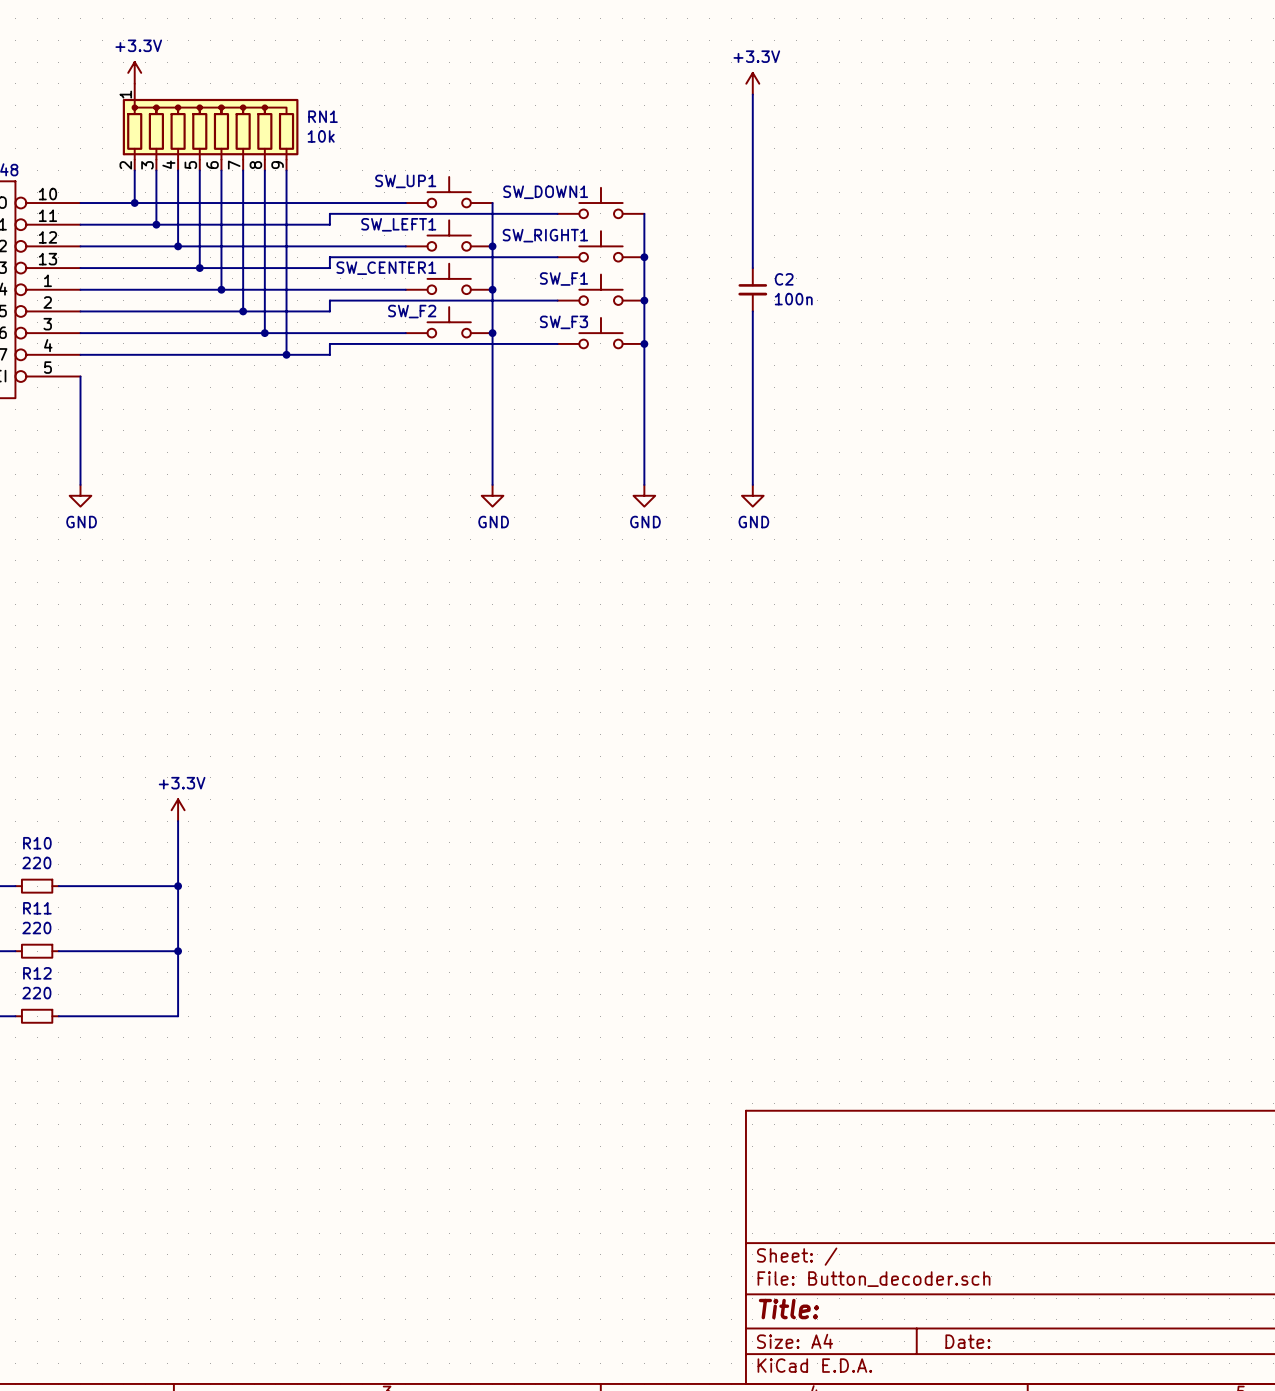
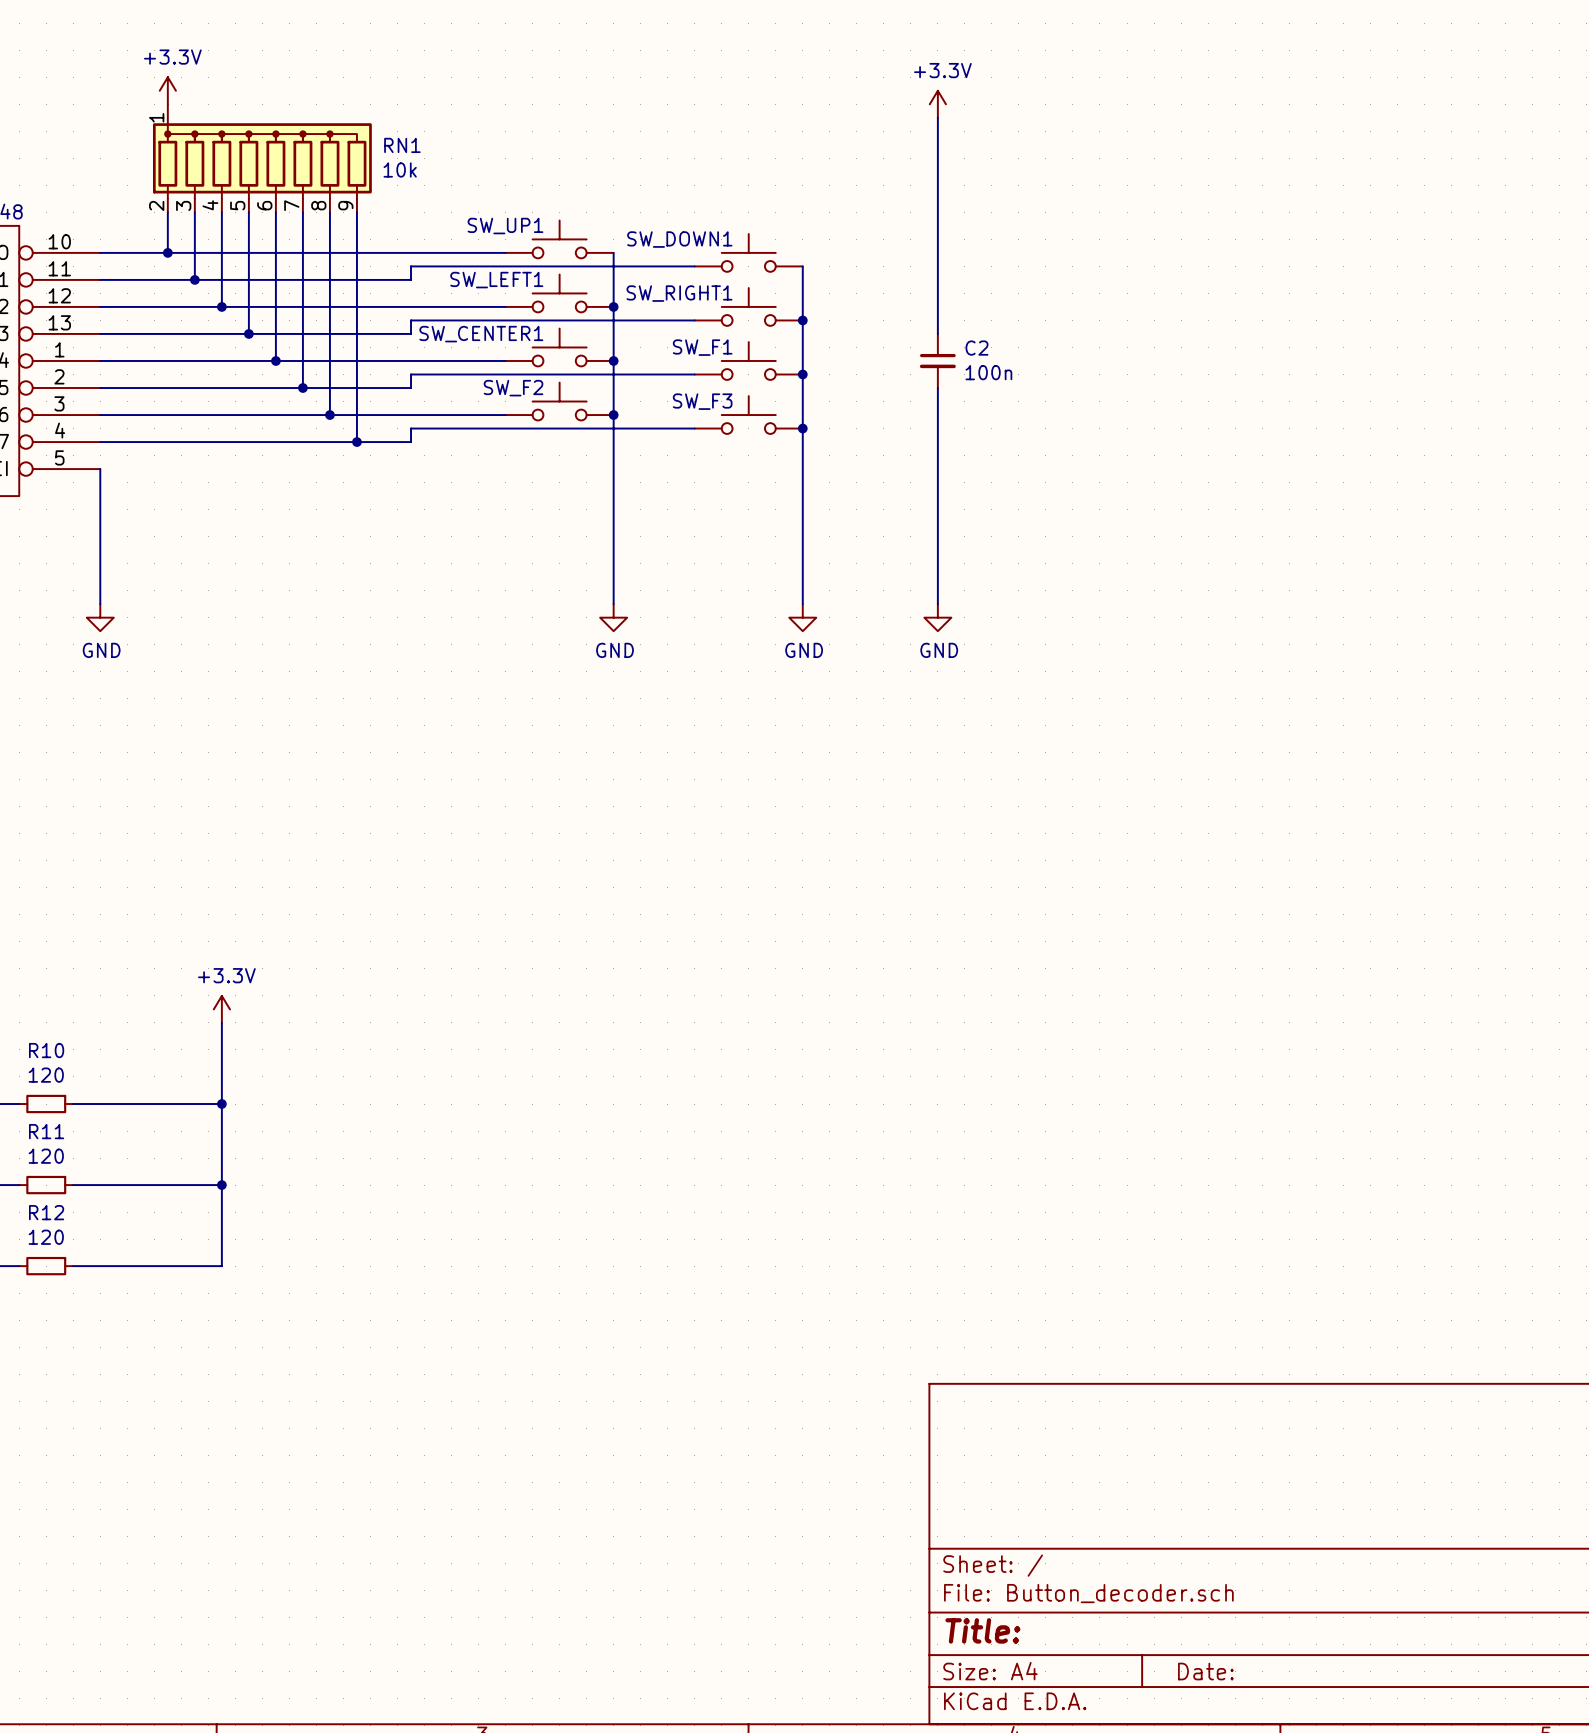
R10 value: 220 (36, 862) -> 120 (46, 1075)
R11 value: 220 (36, 928) -> 120 (46, 1156)
R12 value: 220 (36, 993) -> 120 (46, 1237)

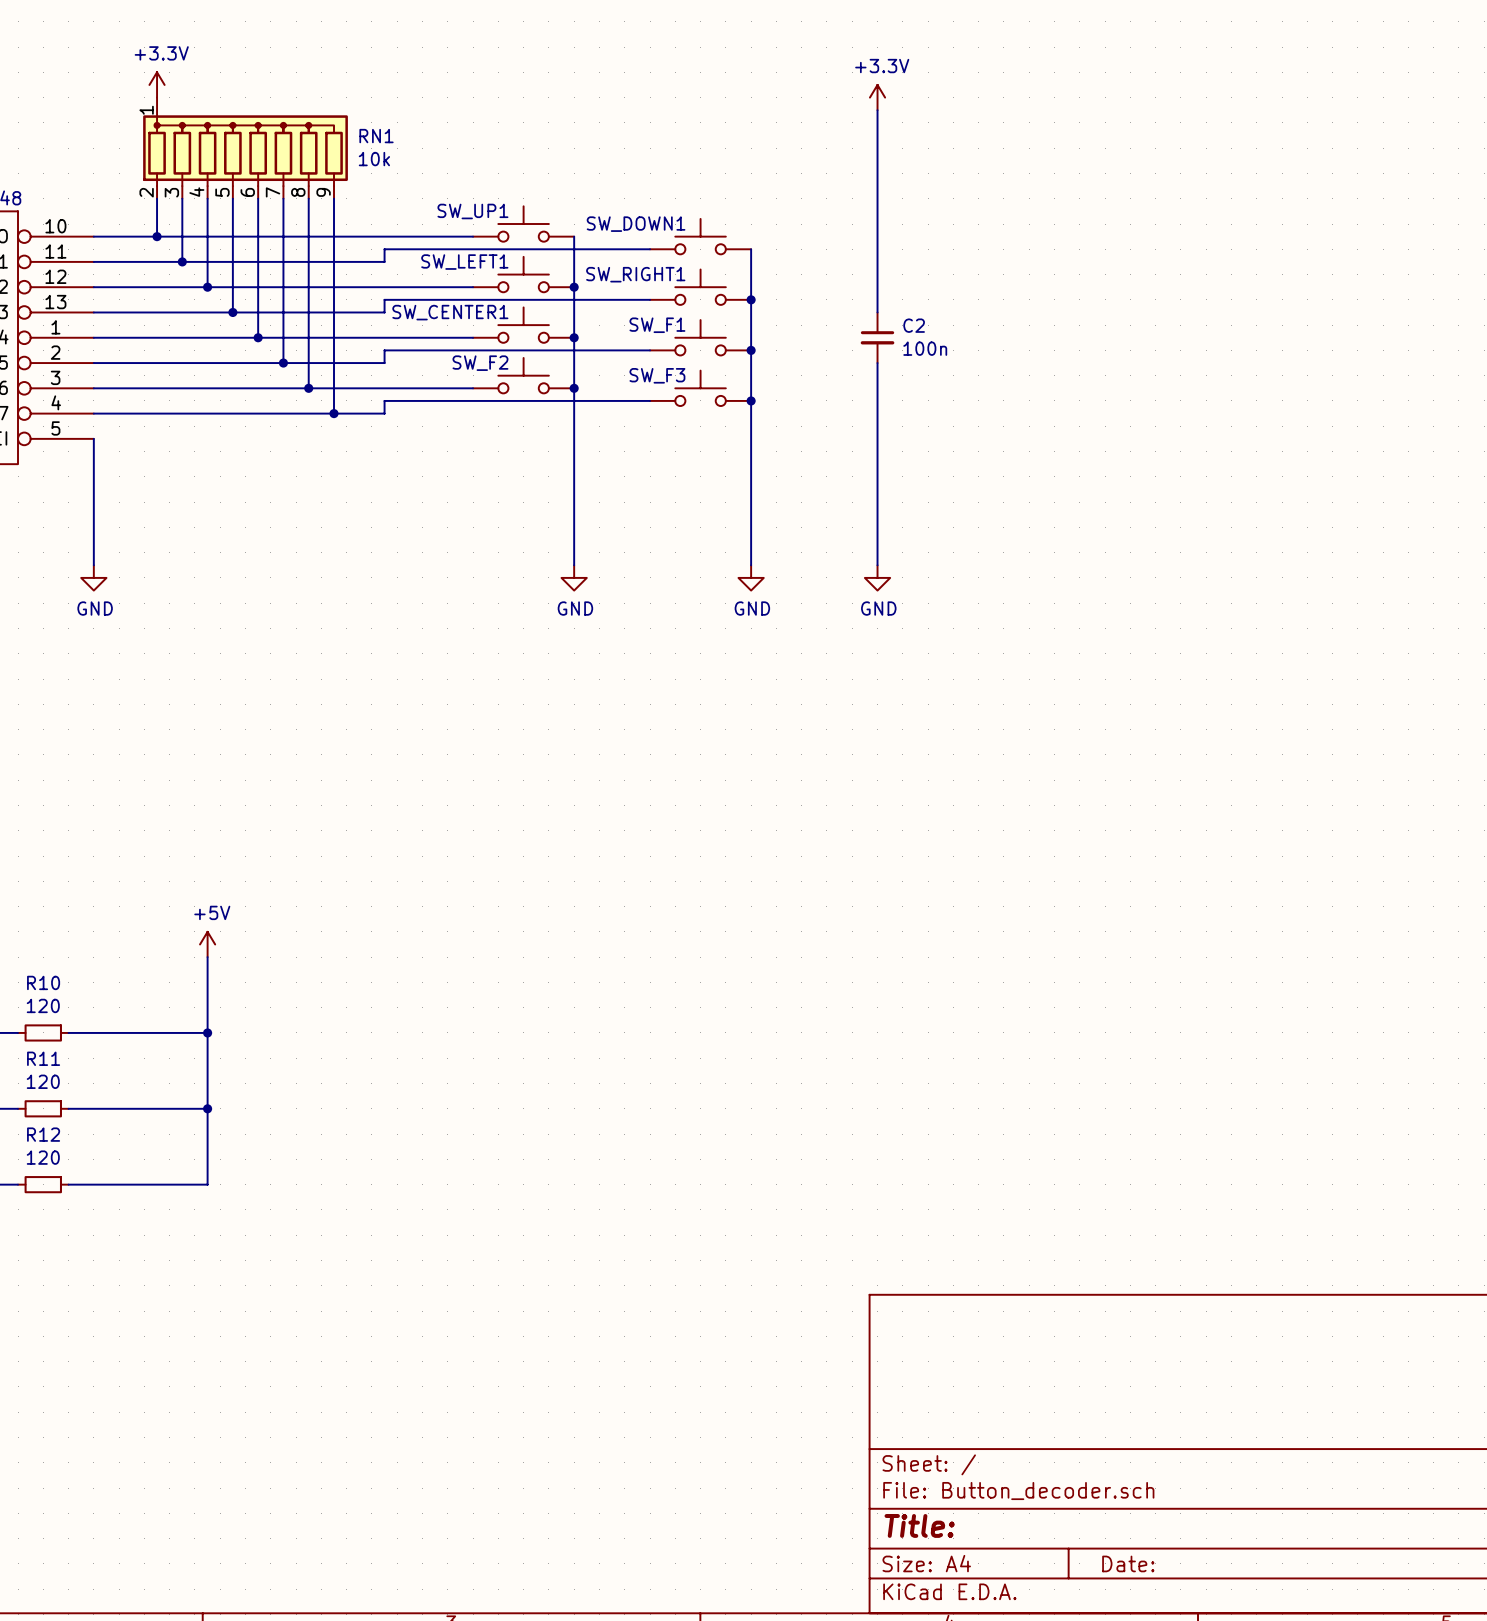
power symbol: +3.3V (221, 1009) -> +5V (207, 944)

